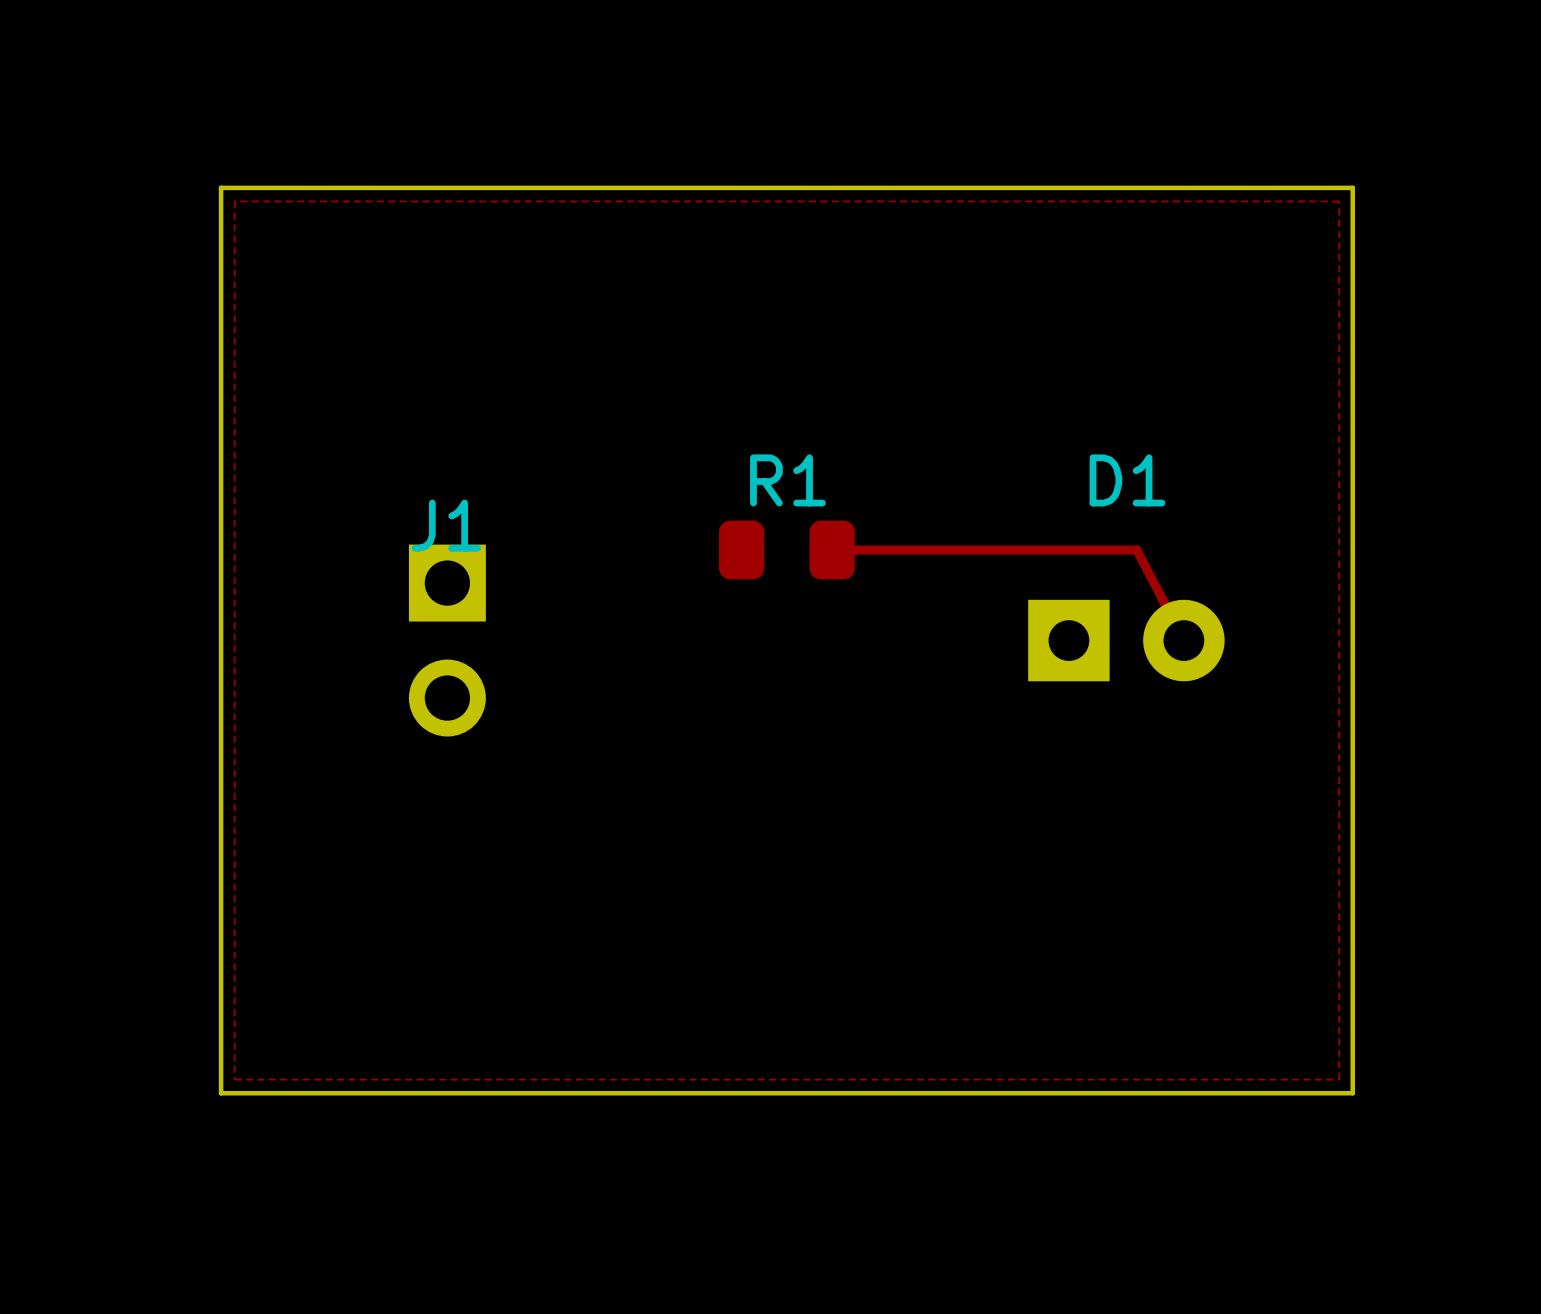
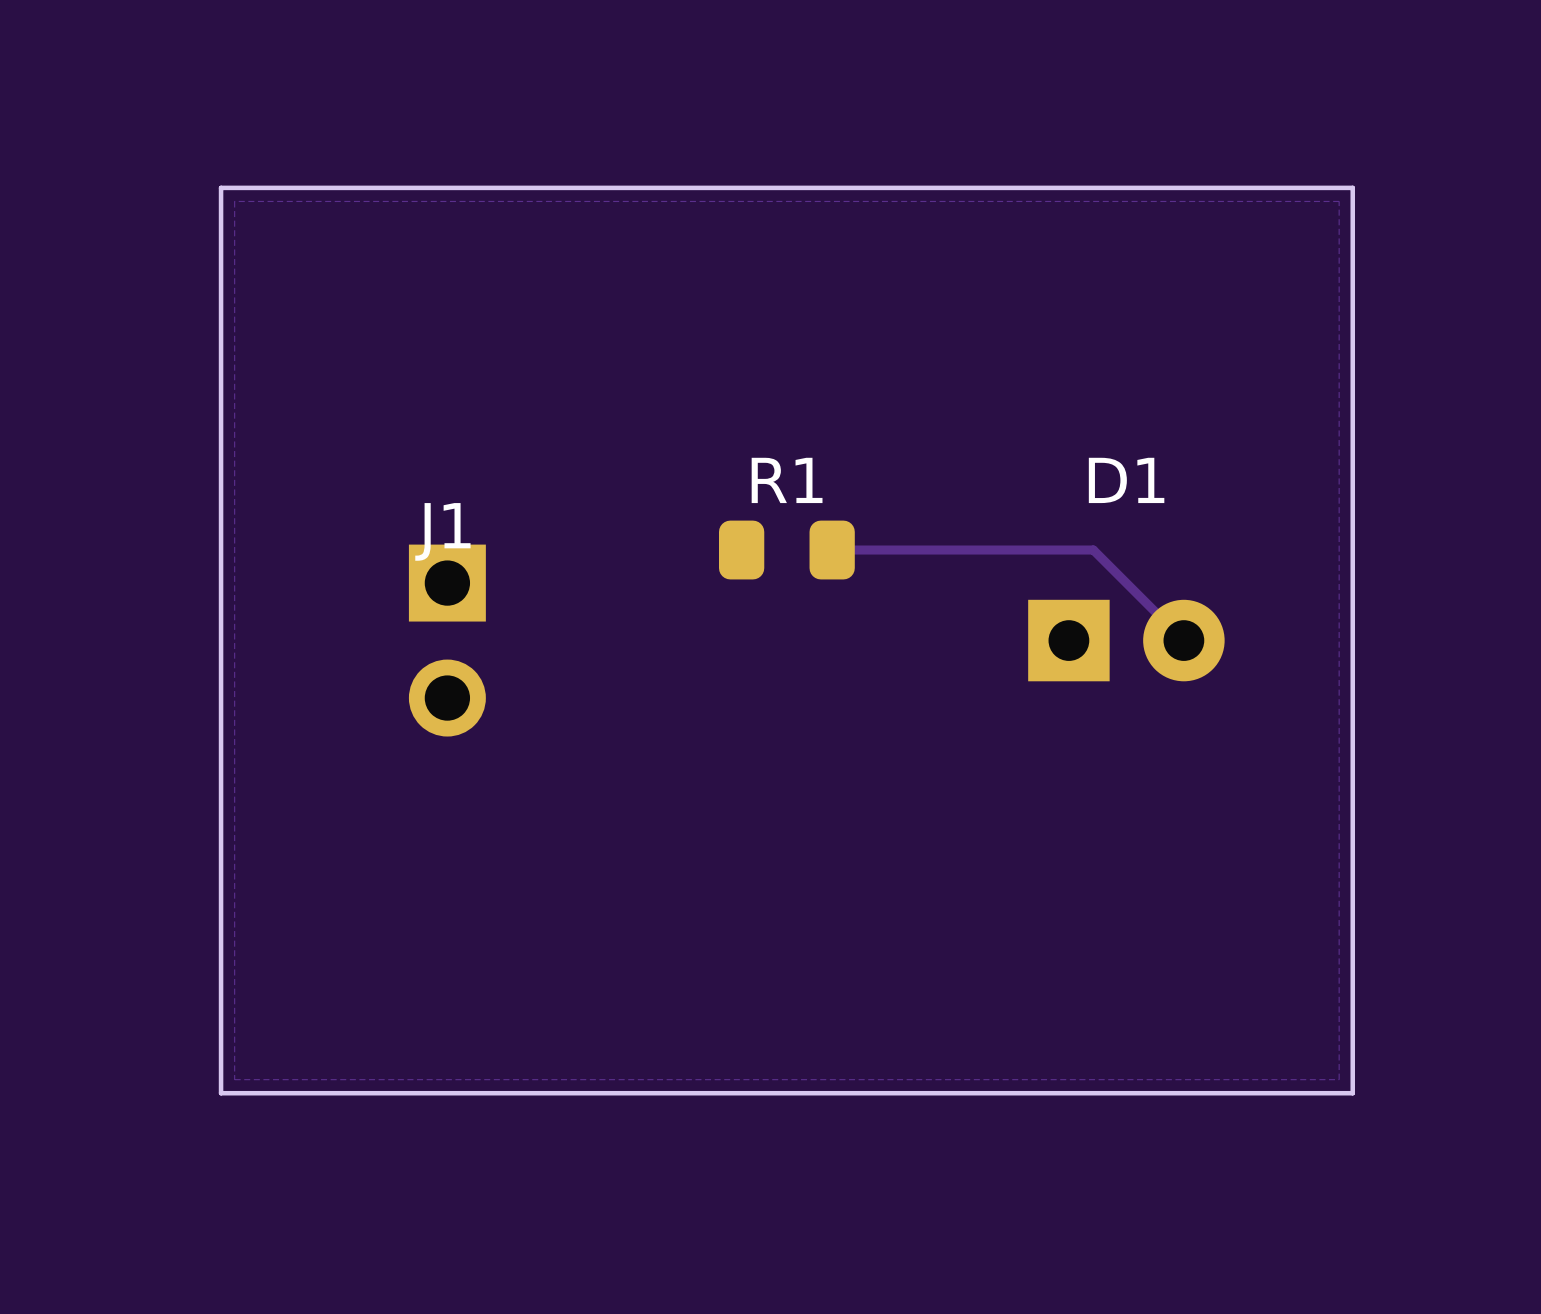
track: (1093, 550) (1136, 550) (1183, 640) -> (1093, 550) (1183, 640)

